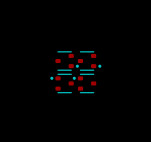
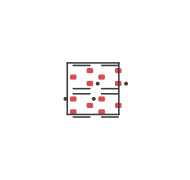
line: none -> (67, 62) (118, 62) (118, 114) (67, 114) (67, 62)

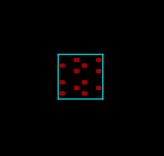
part footprint: [69, 64, 100, 90] -> [59, 57, 80, 74]
part footprint: [98, 64, 128, 90] -> [81, 57, 102, 74]
part footprint: [63, 93, 94, 118] -> [59, 80, 80, 96]
part footprint: [91, 93, 122, 118] -> [81, 80, 102, 96]

